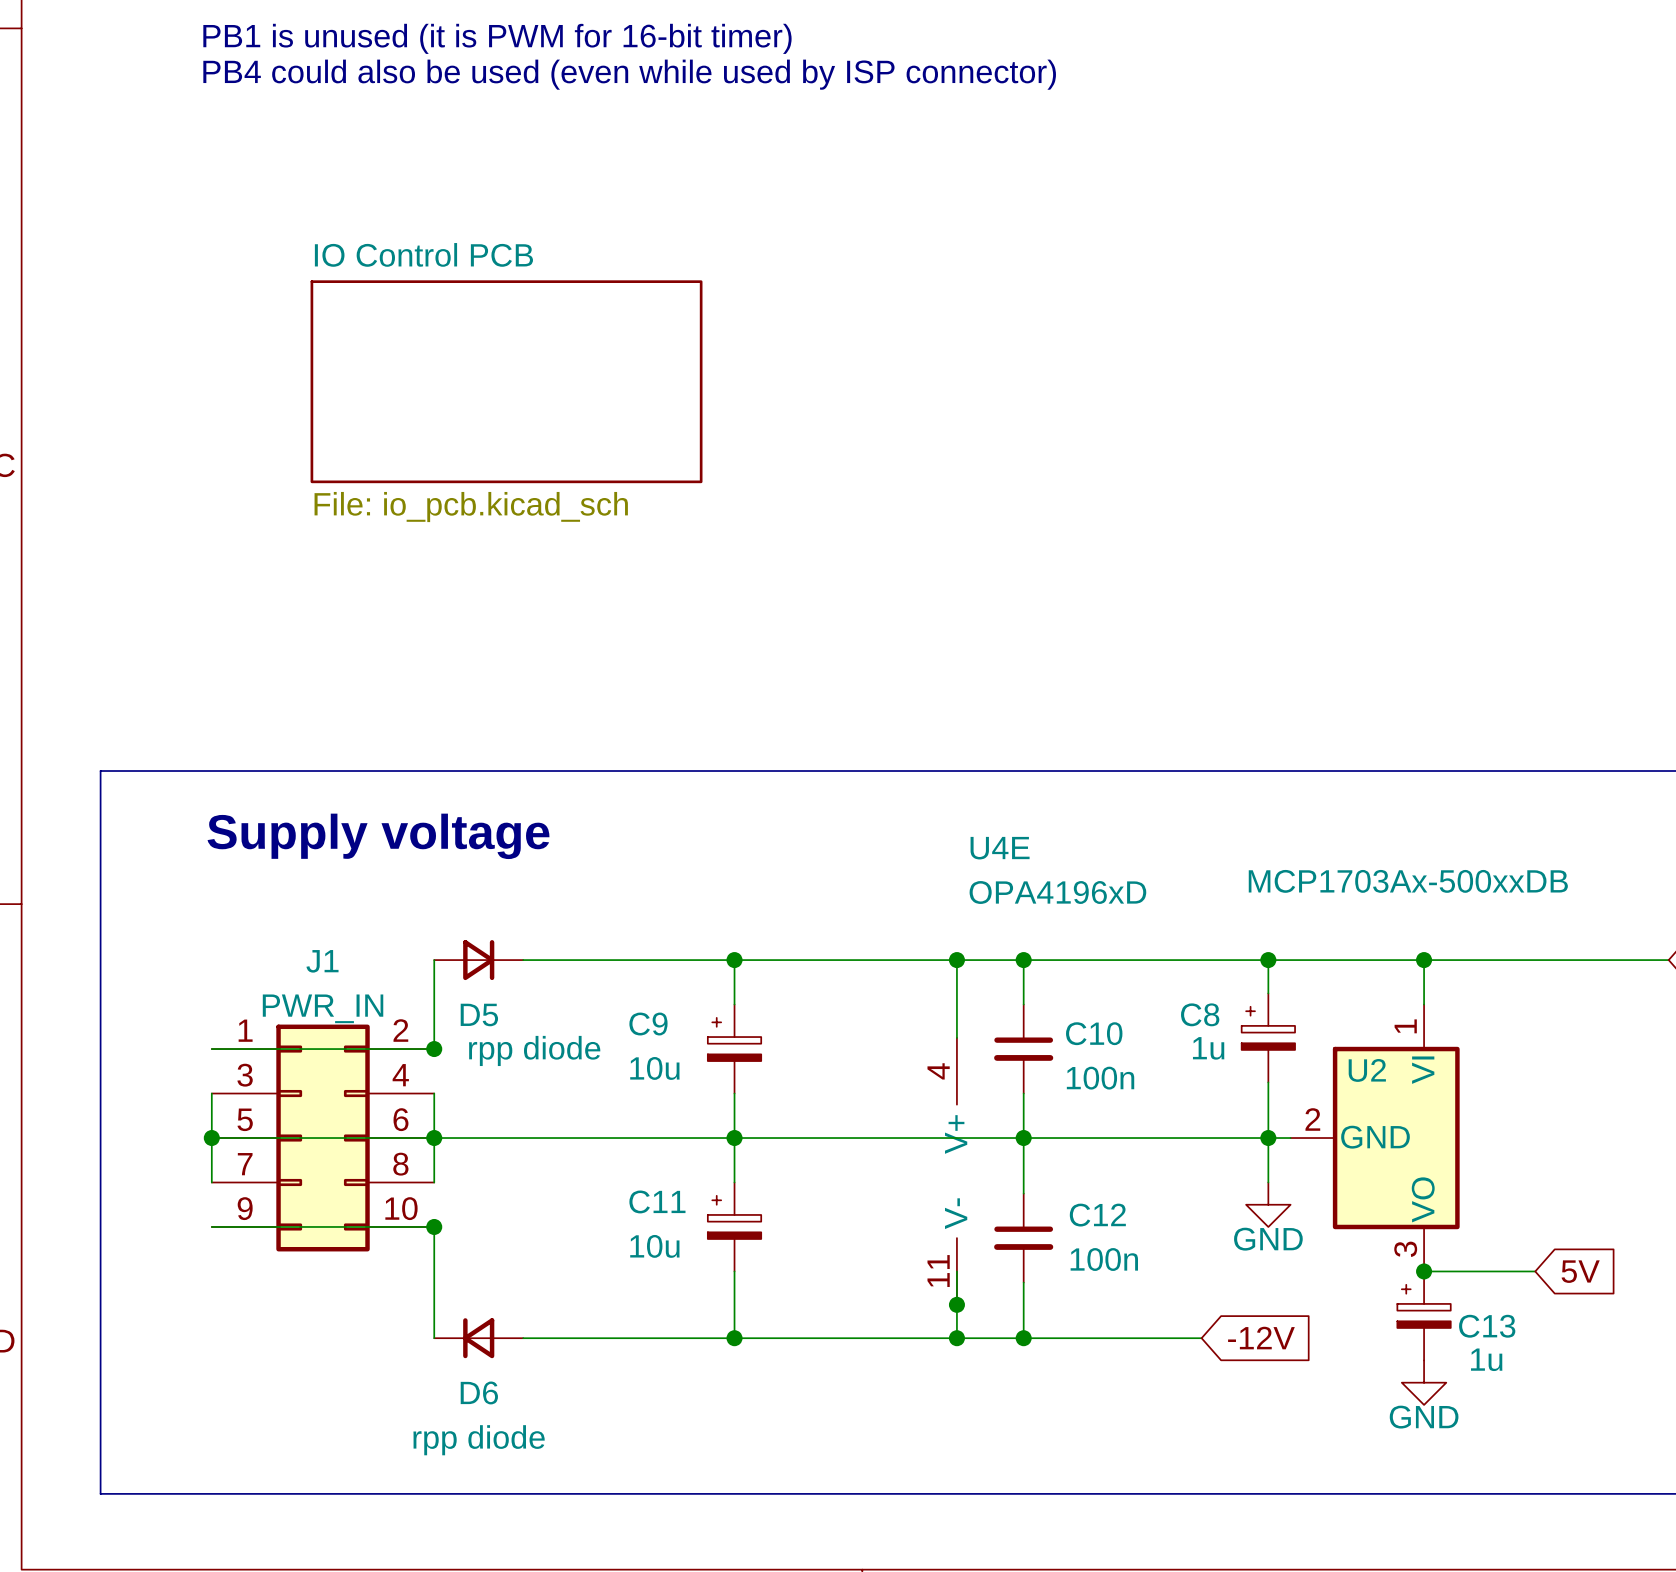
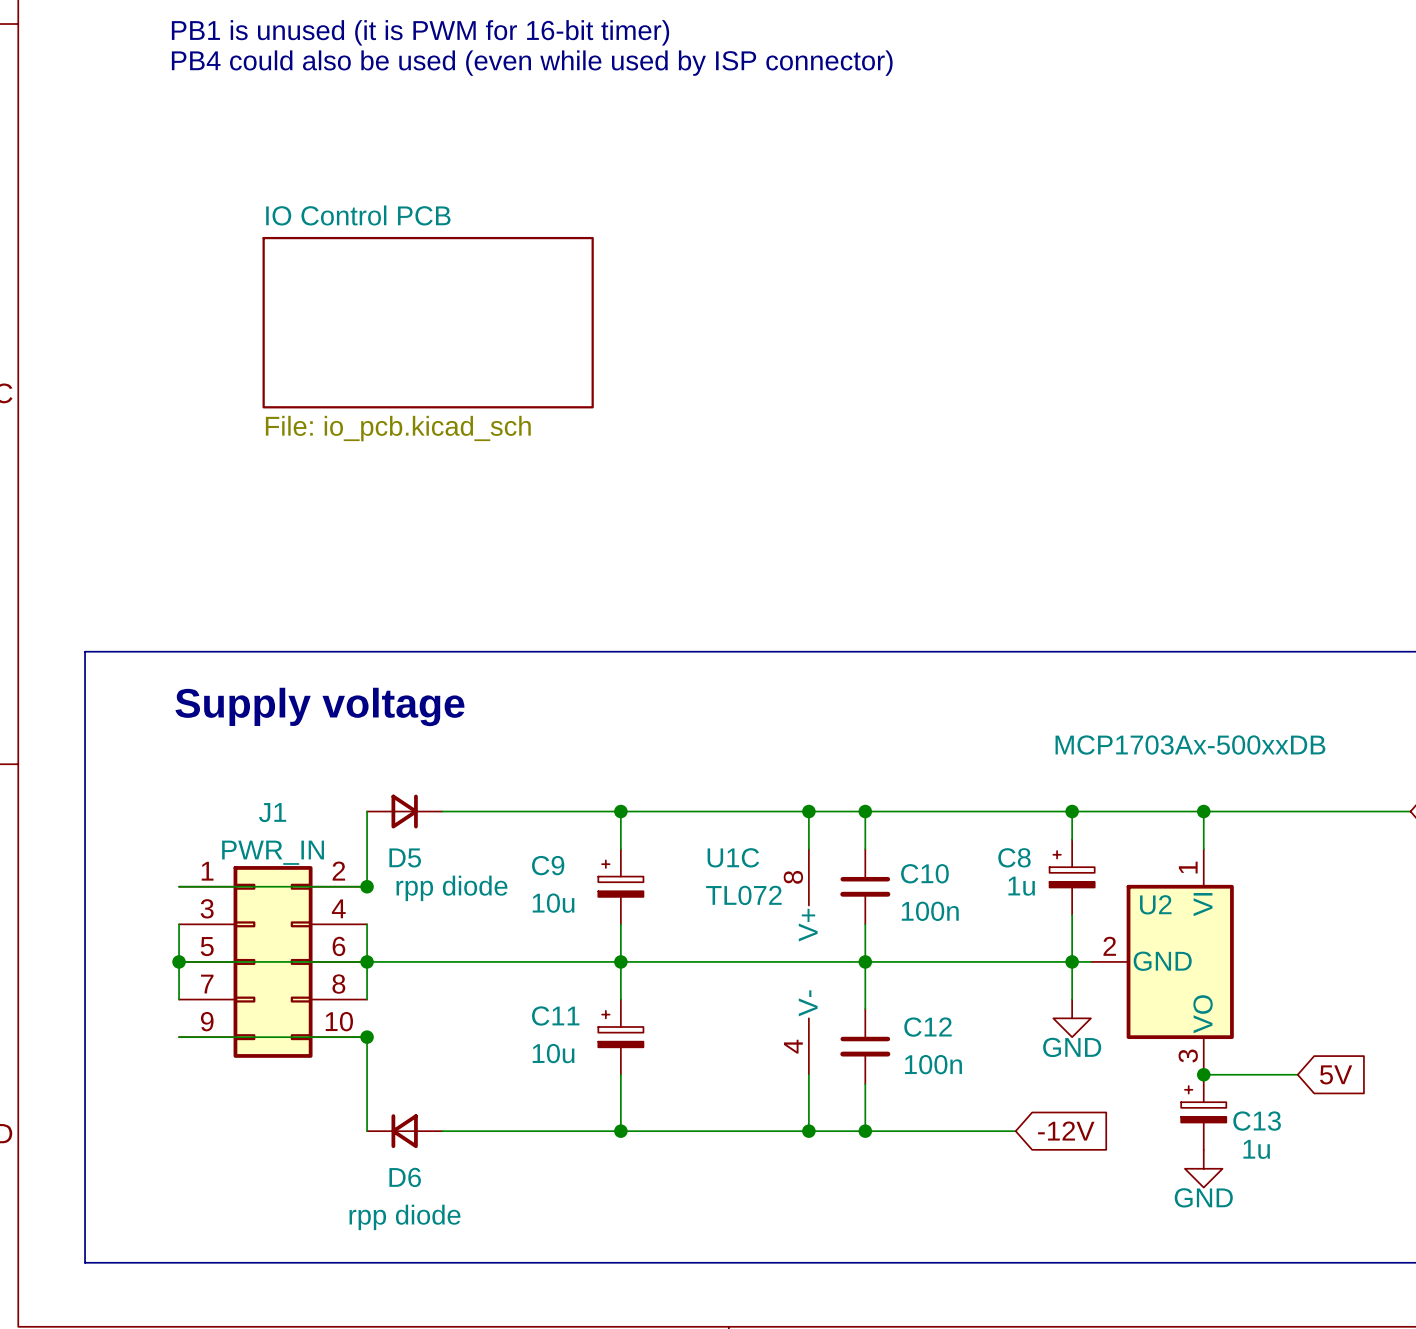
U1C: none -> TL072 (808, 961)
U4E: OPA4196xD (956, 1171) -> none
junction: (956, 1304) -> none

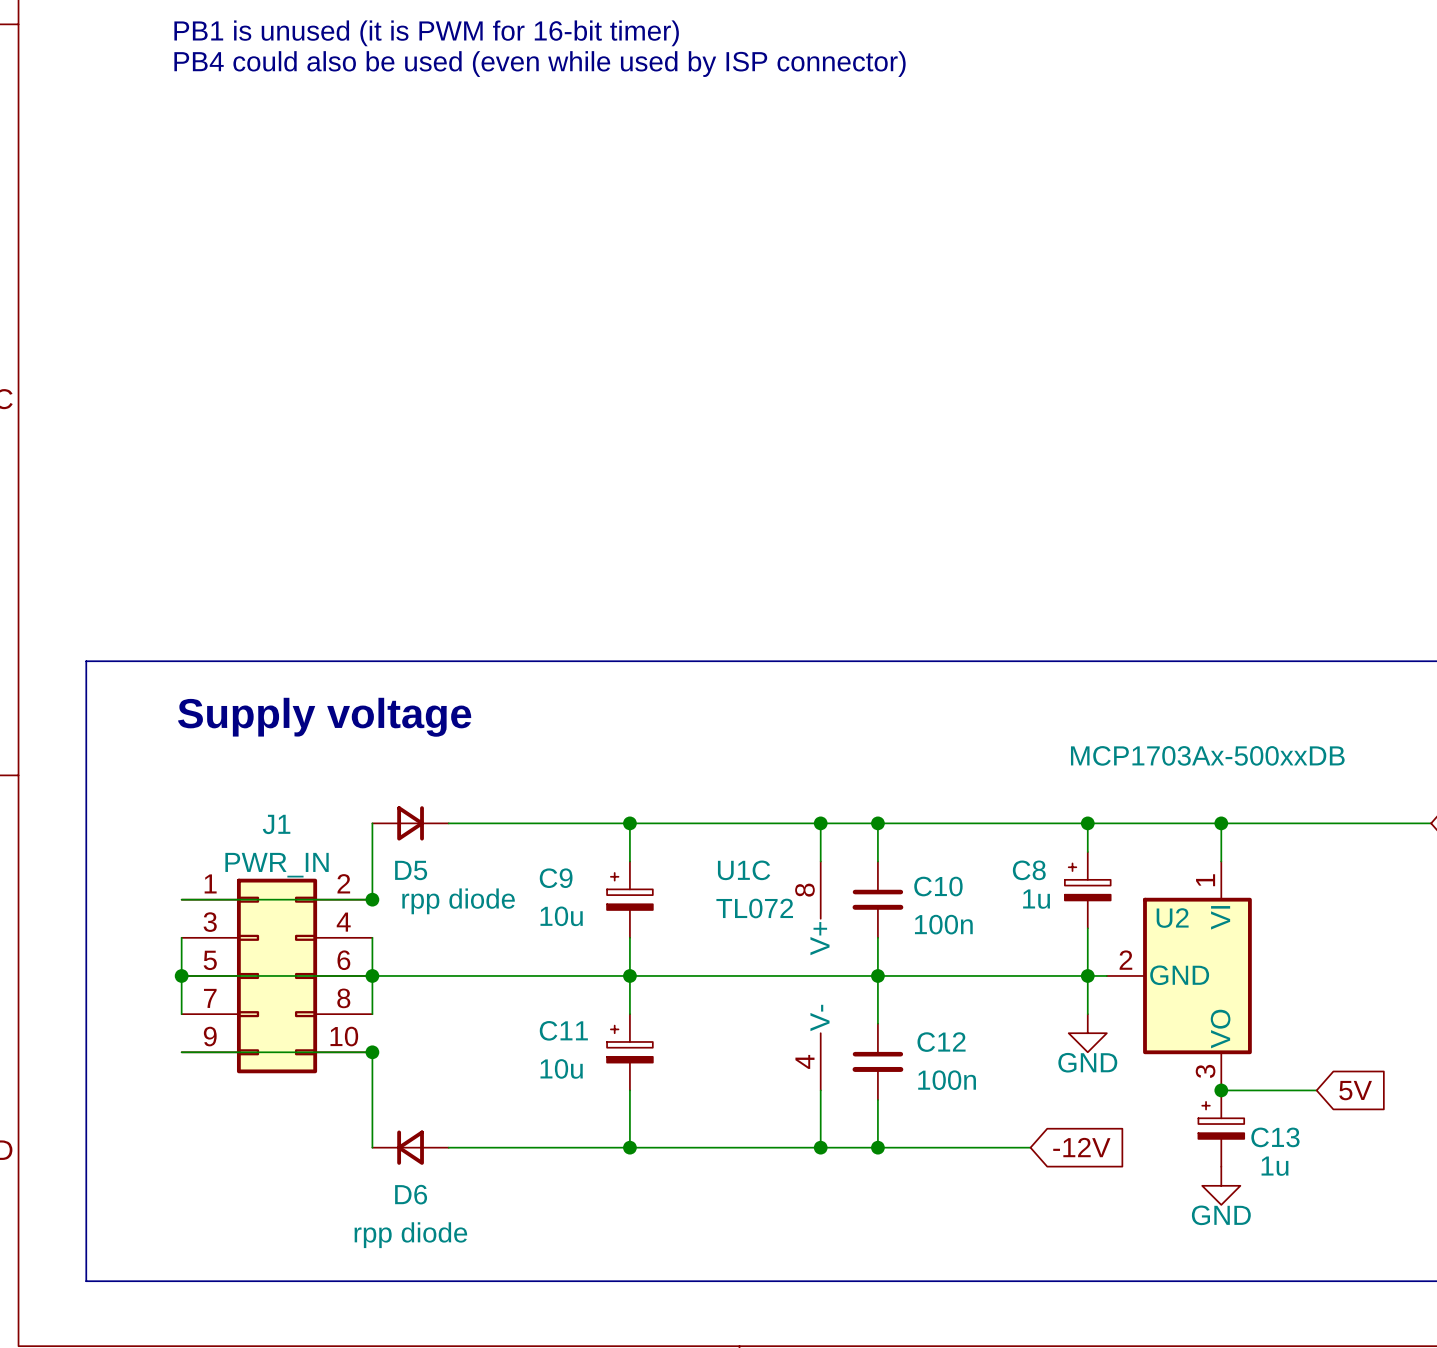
sheet IO Control PCB: File: io_pcb.kicad_sch (428, 322) -> none

